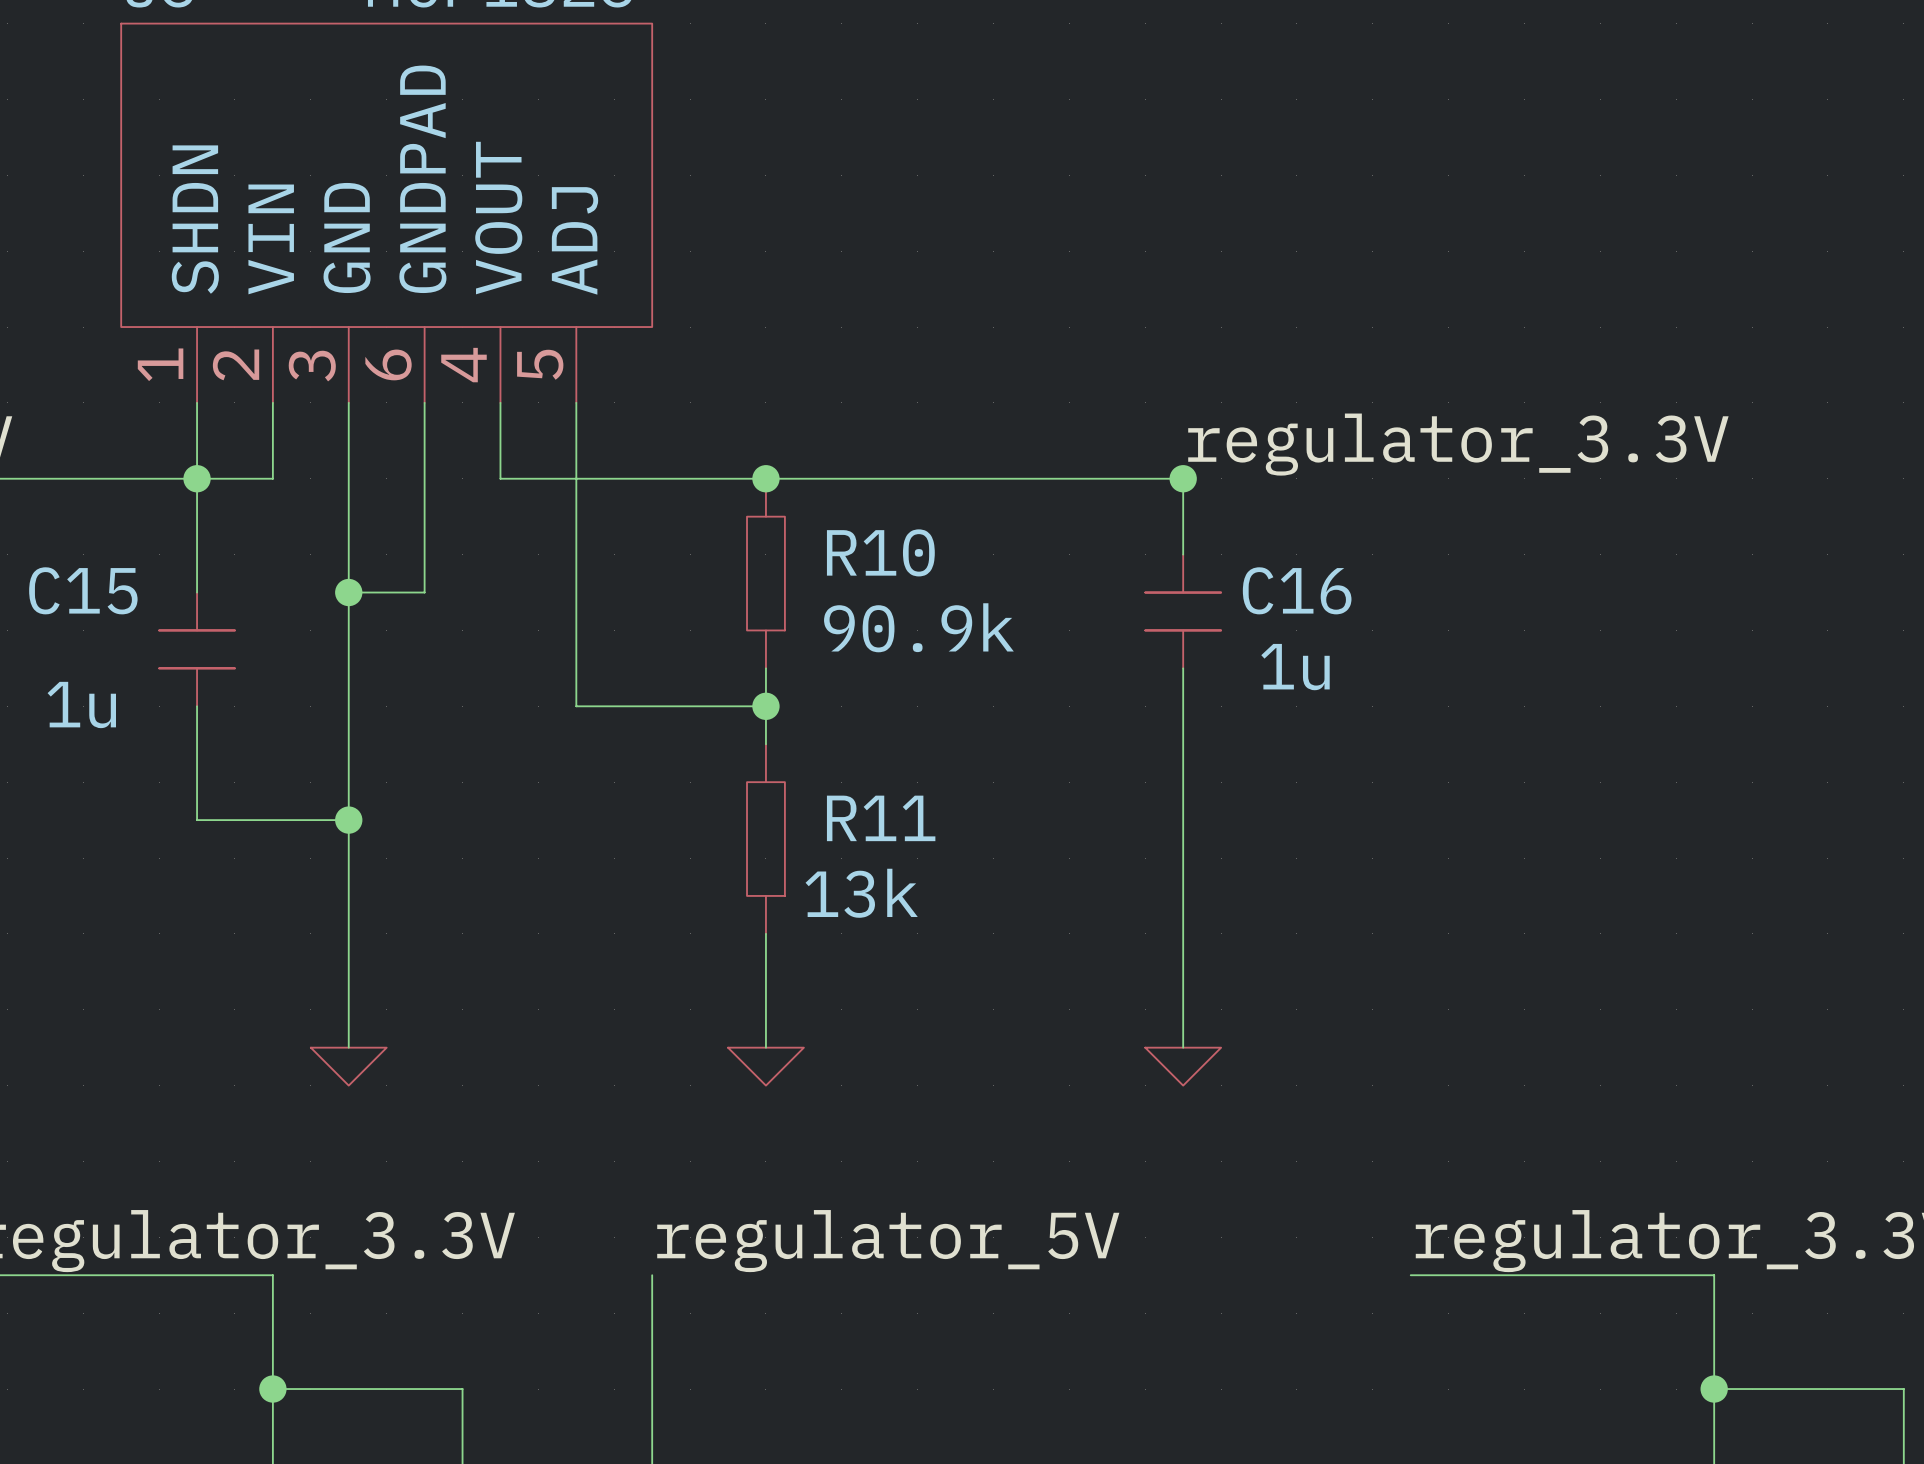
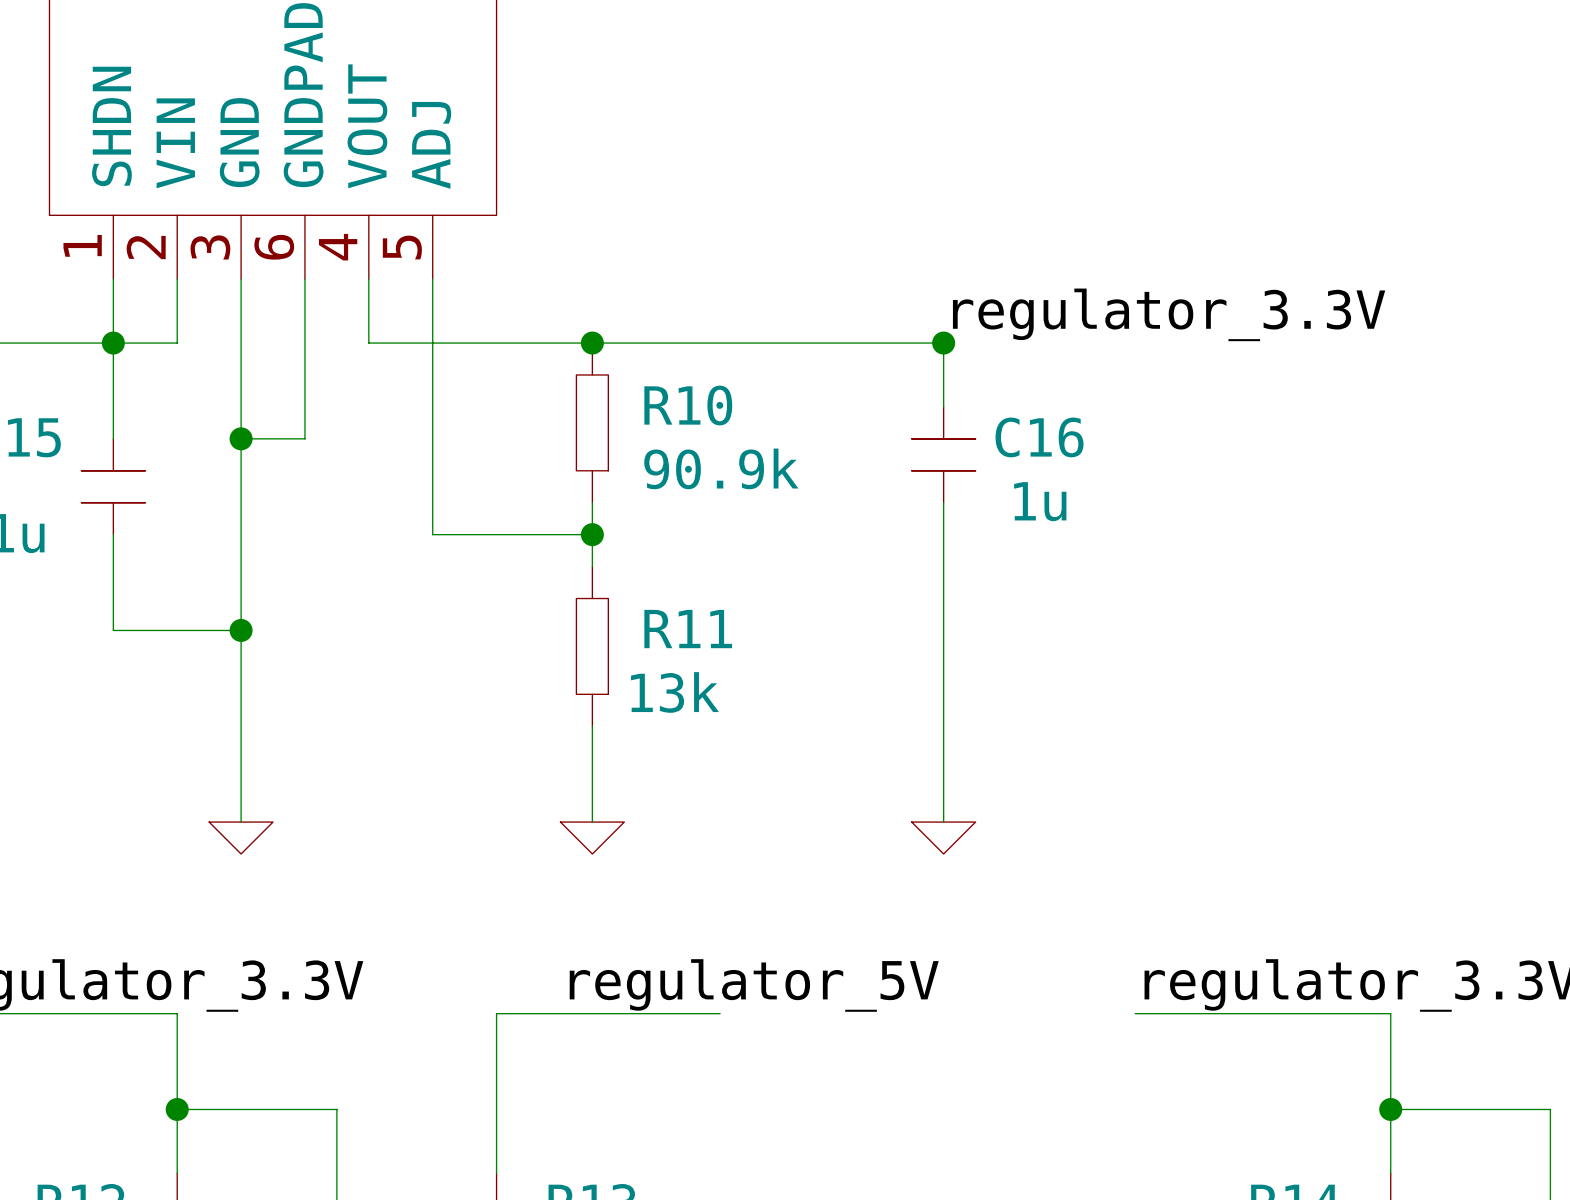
label position: regulator_5V (888, 1241) -> regulator_5V (754, 985)
wire: none -> (496, 1013) (720, 1013)

